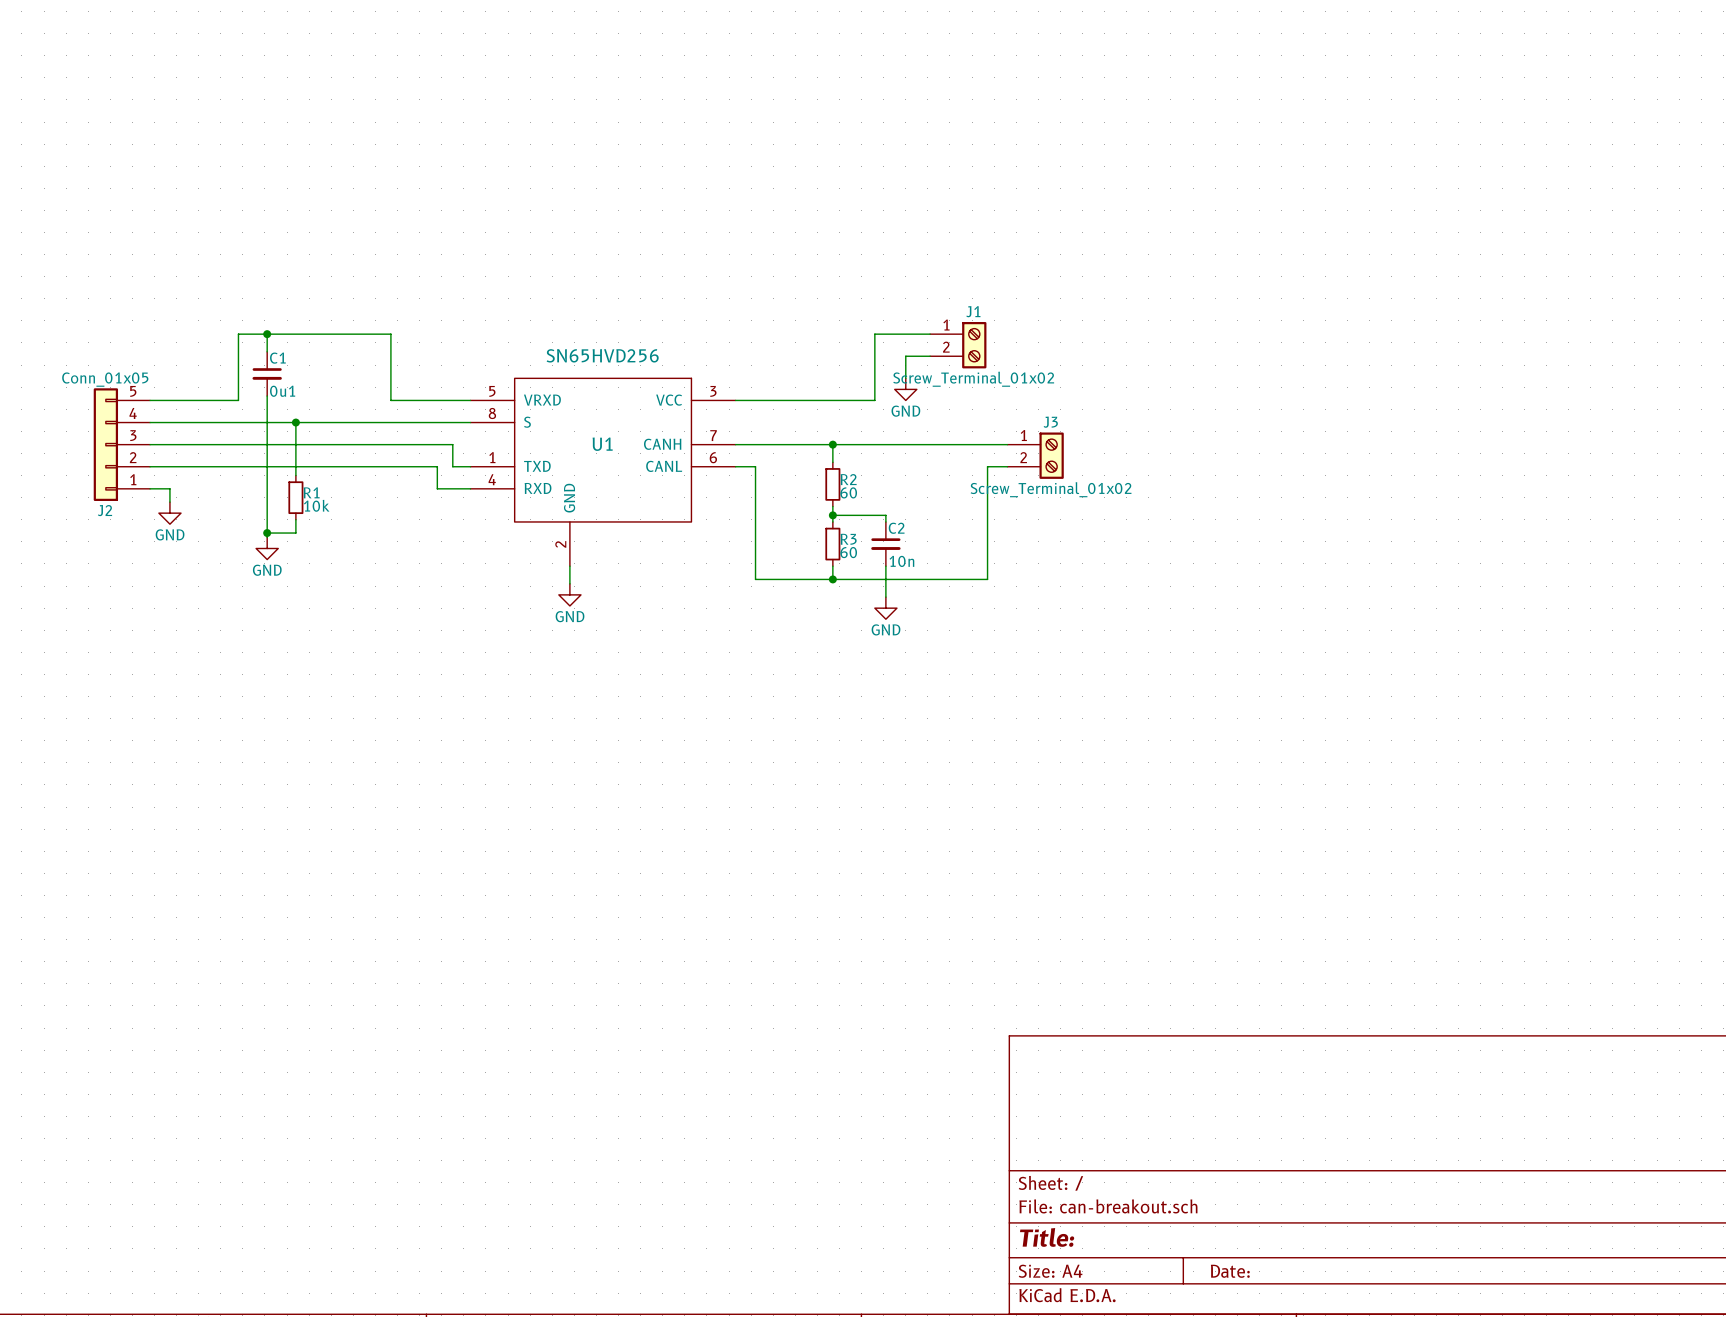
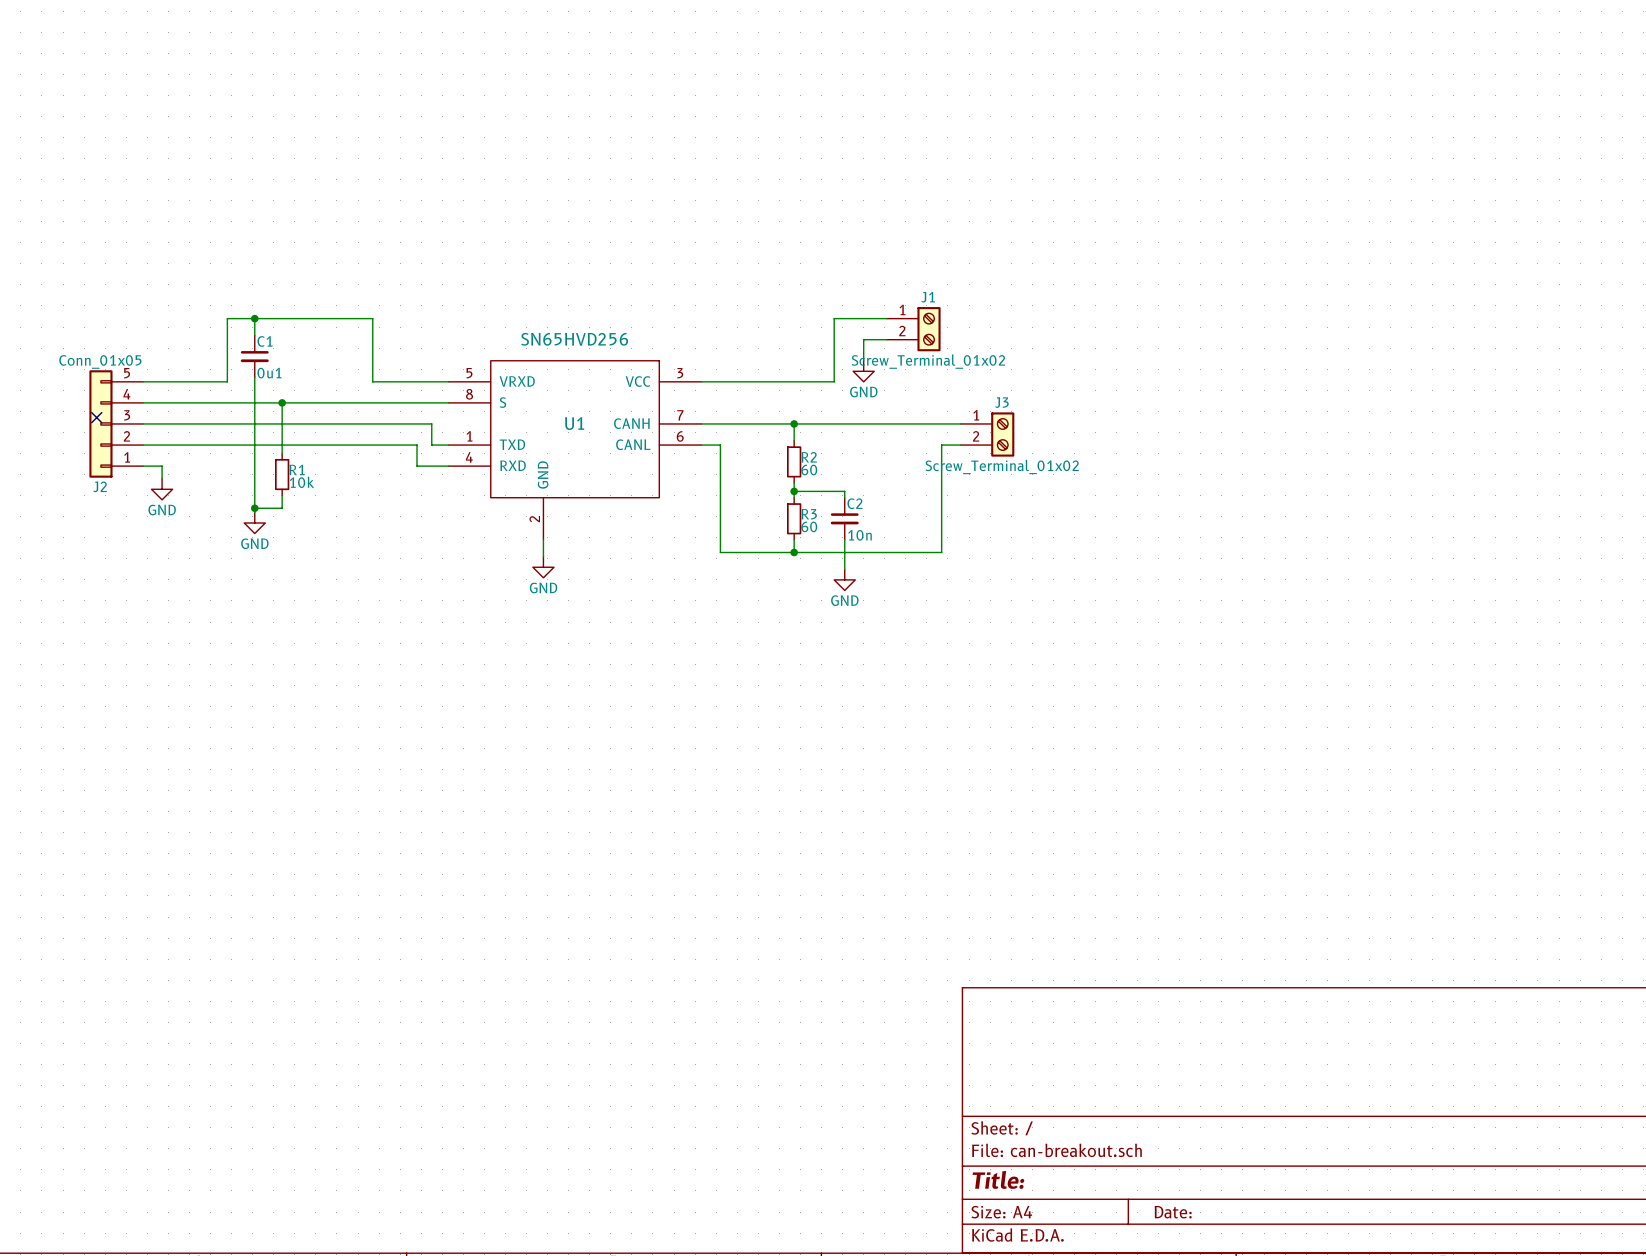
no-connect mark: none -> (96, 417)

